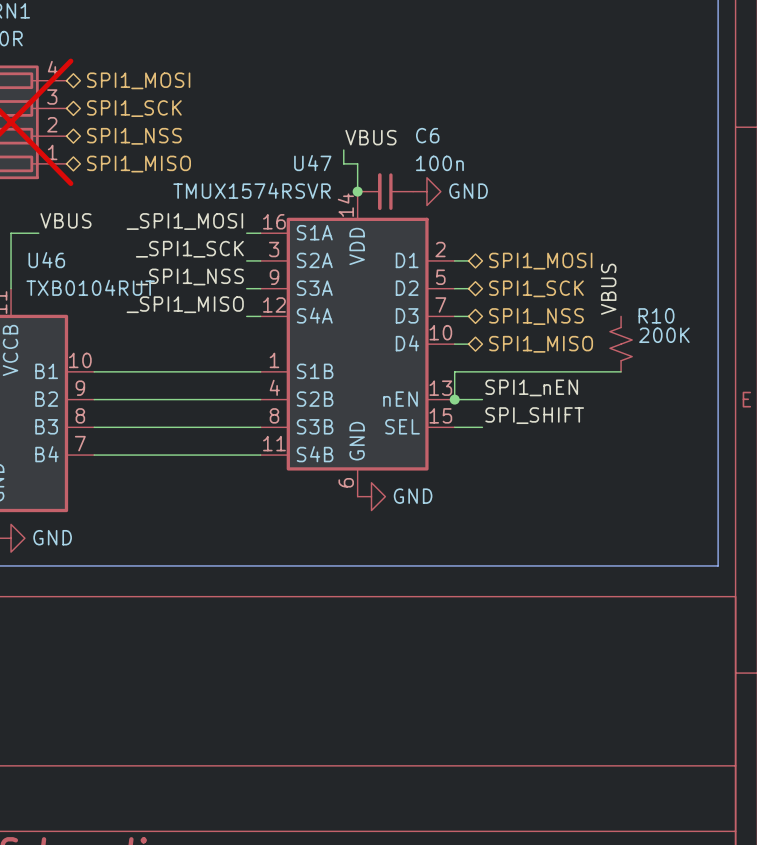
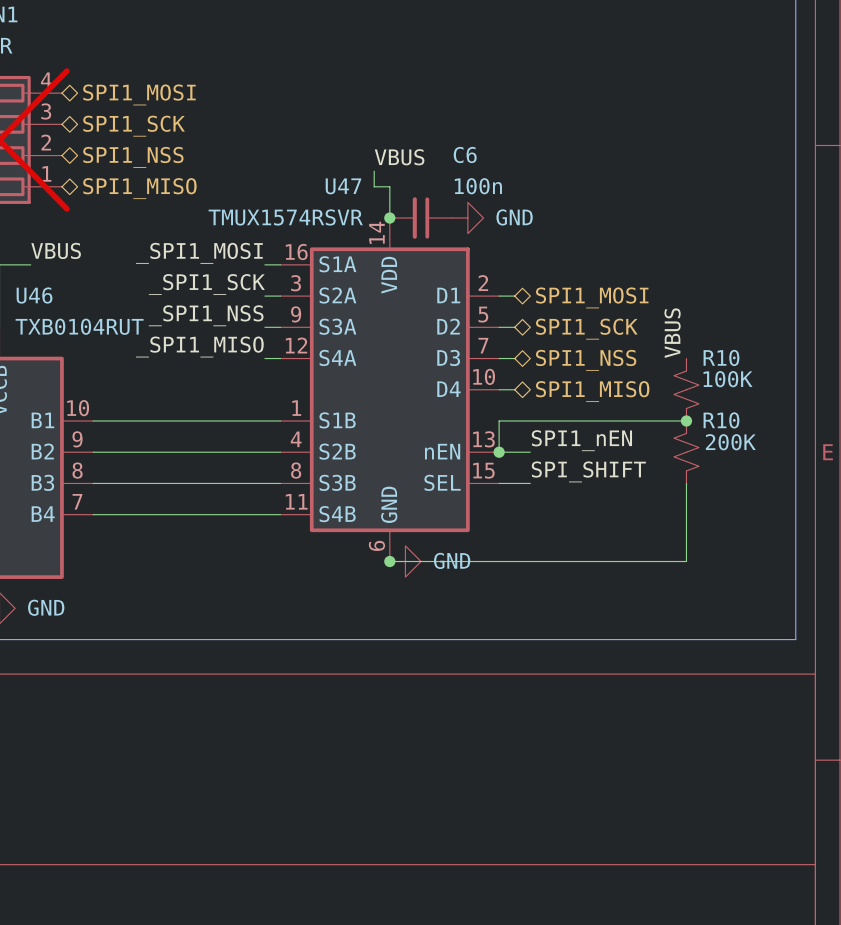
R10 value: 200K (664, 335) -> 100K (727, 379)
junction: none -> (686, 420)
R10: none -> 200K (686, 452)
wire: none -> (686, 483) (686, 561) (389, 561)
junction: none -> (389, 561)

